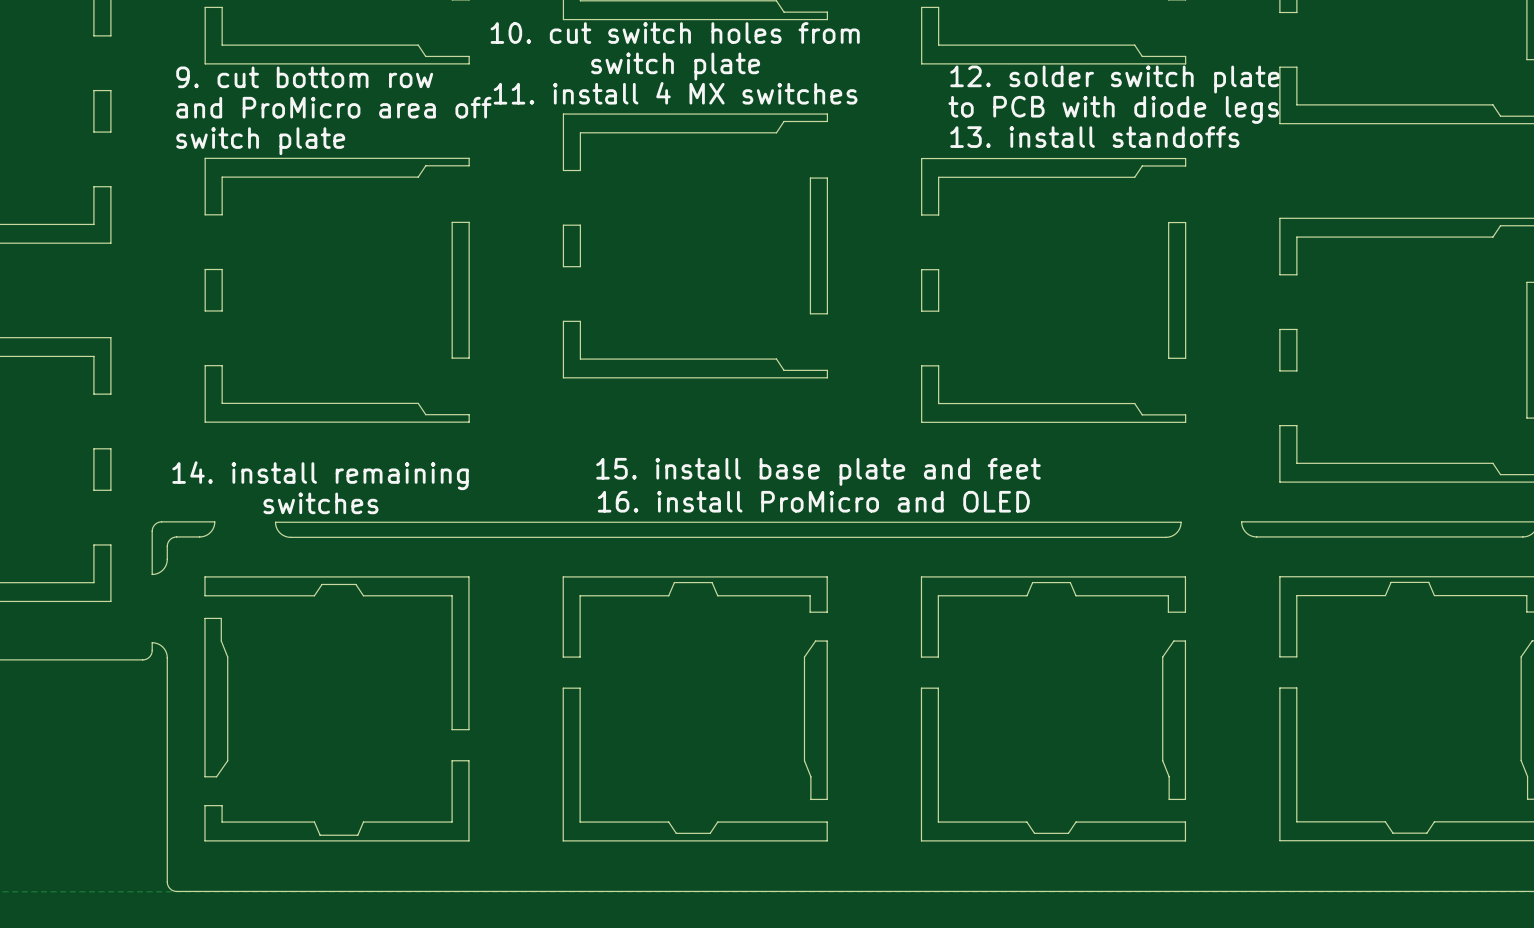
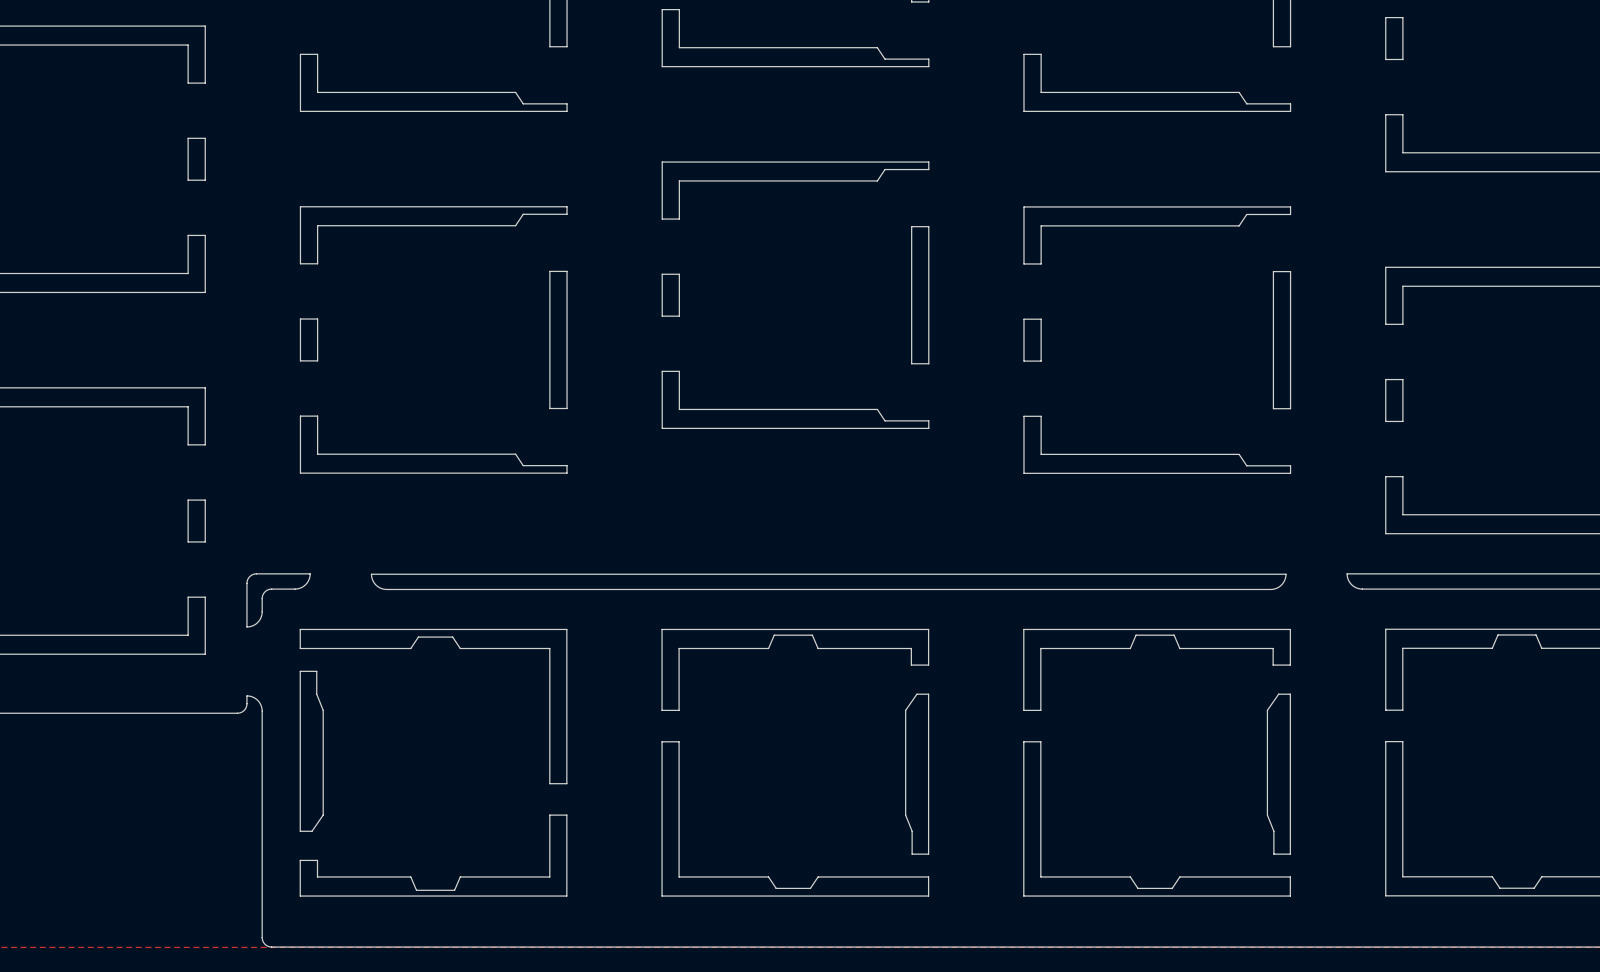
text: 10. cut switch holes from (675, 33) -> none
text: switch plate (675, 66) -> none
text: 9. cut bottom row (304, 77) -> none
text: 12. solder switch plate (1115, 79) -> none
text: 11. install 4 MX switches (675, 93) -> none
text: and ProMicro area off (333, 107) -> none
text: to PCB with diode legs (1113, 109) -> none
text: 13. install standoffs (1094, 137) -> none
text: switch plate (260, 141) -> none
text: 15. install base plate and feet (818, 471) -> none
text: 14. install remaining (320, 475) -> none
text: 16. install ProMicro and OLED (813, 501) -> none
text: switches (320, 503) -> none

